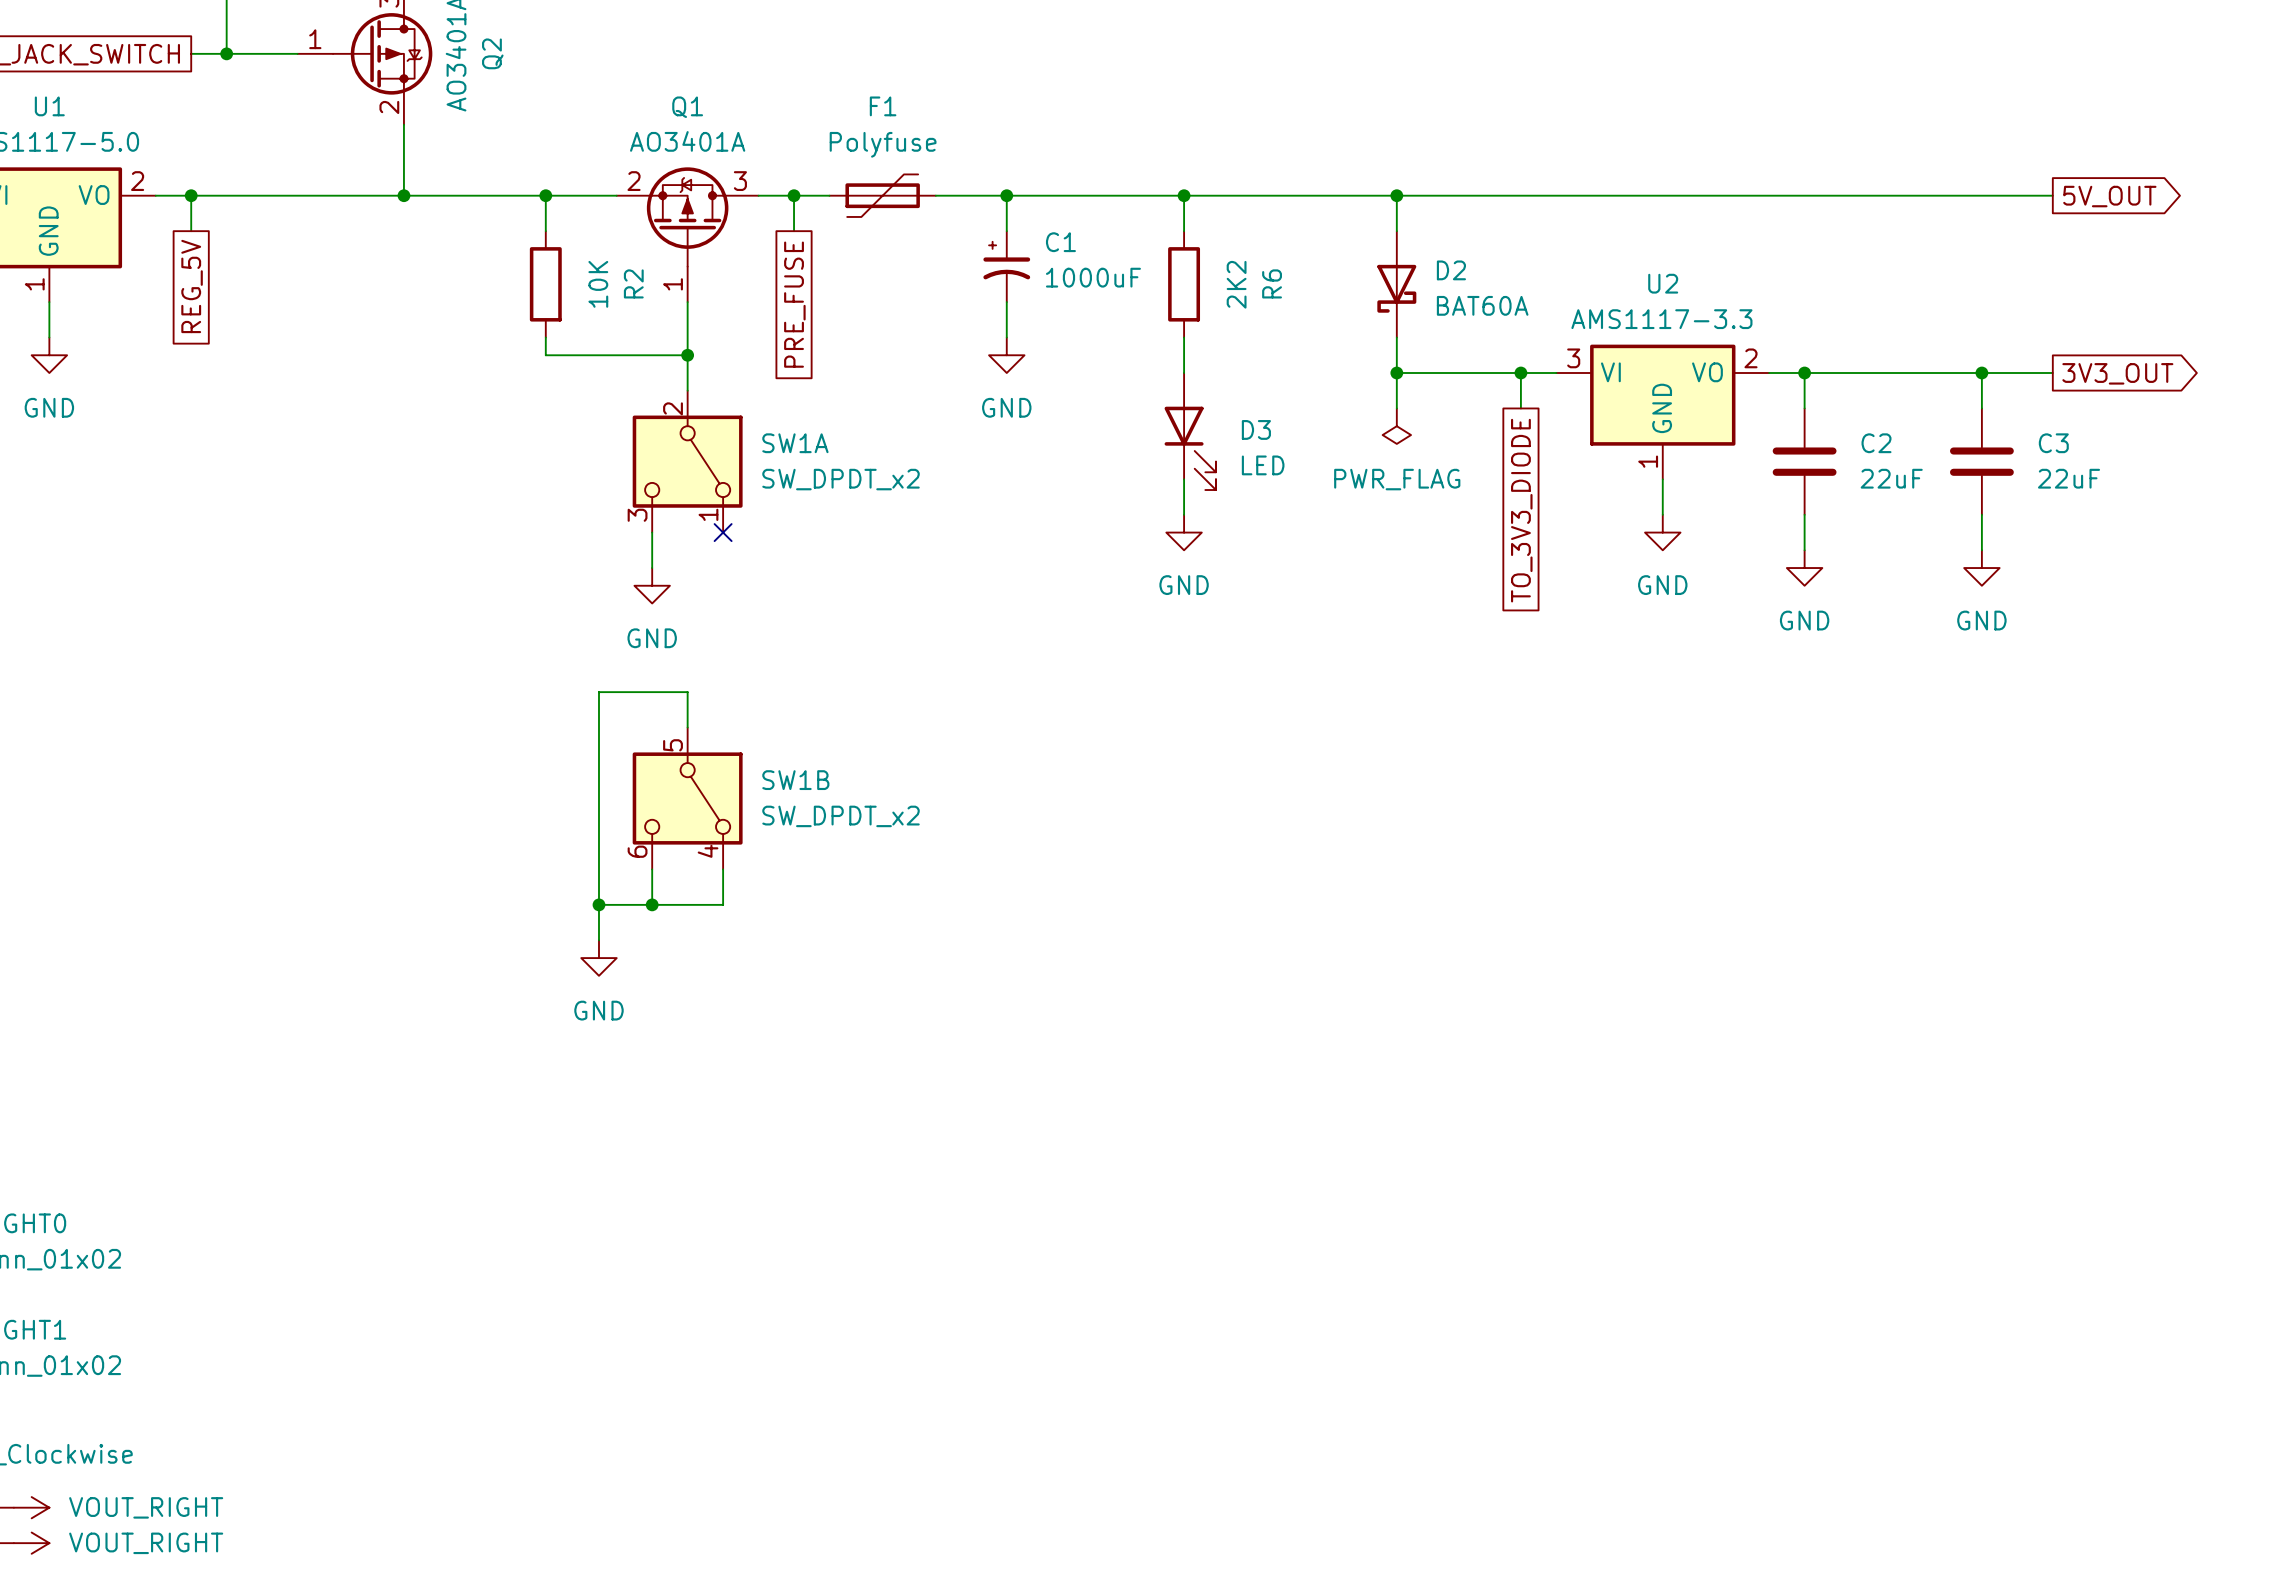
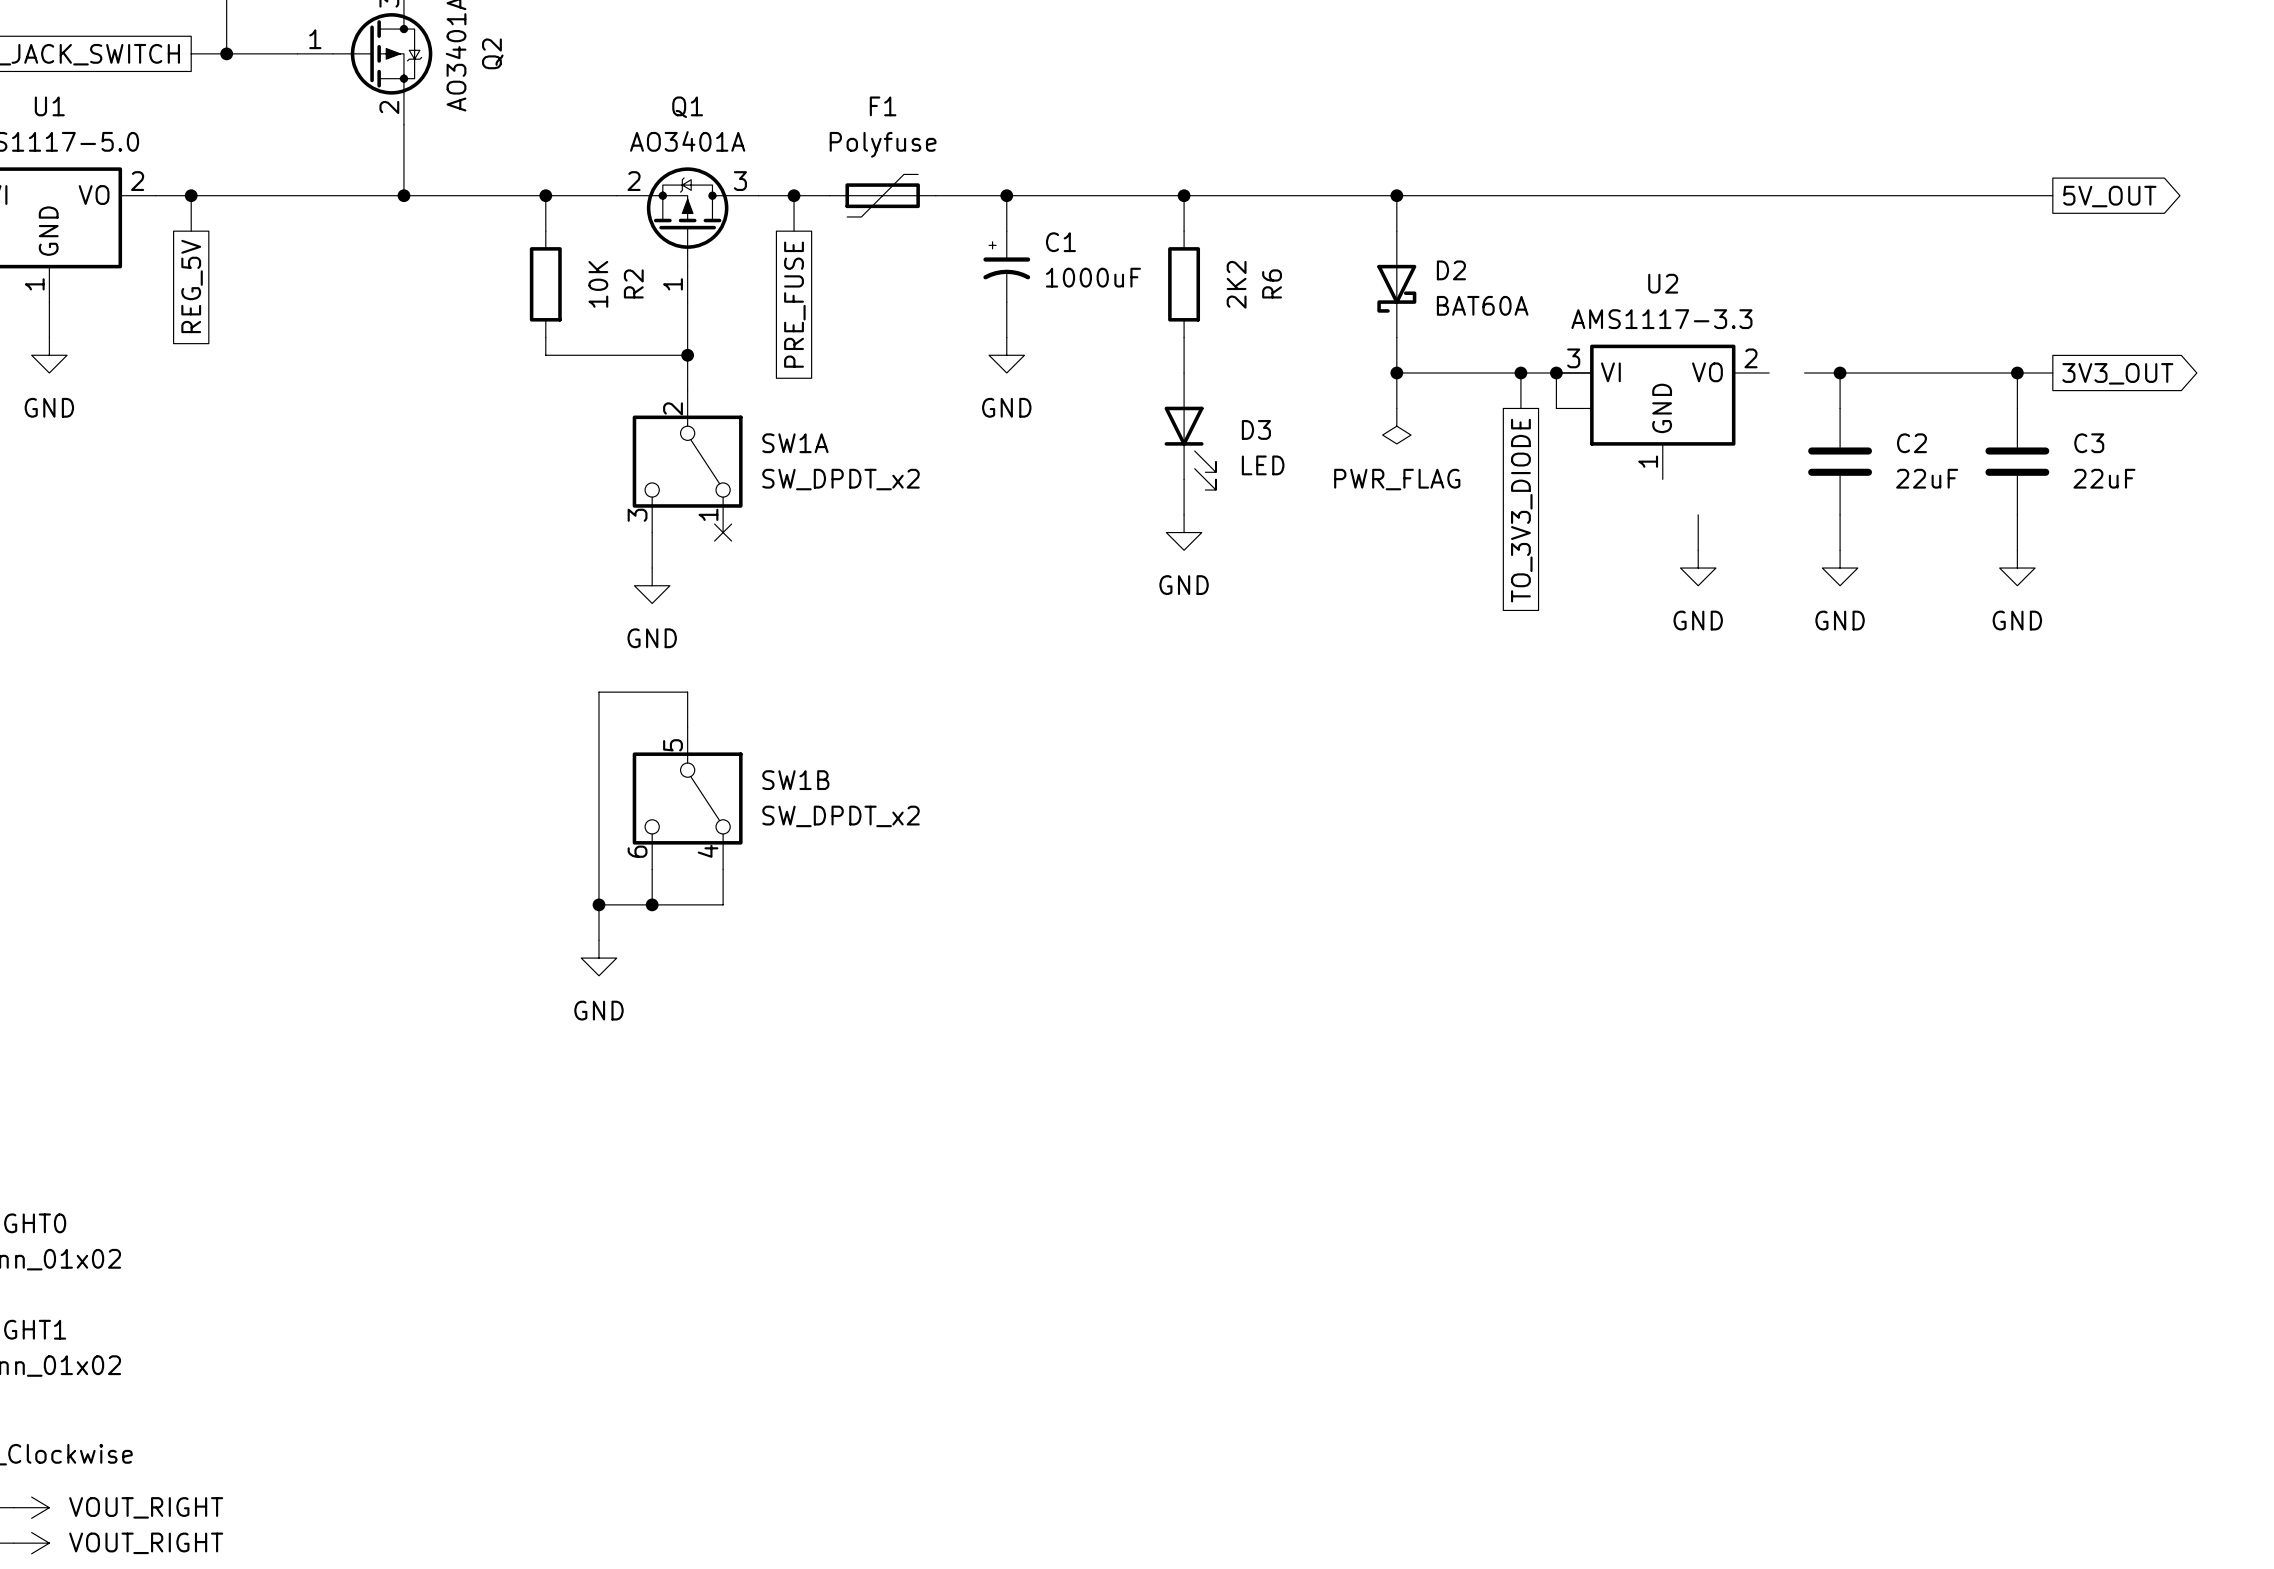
junction: none -> (1556, 372)
wire: none -> (1591, 372) (1556, 372) (1556, 408) (1591, 408)
wire: (1769, 372) (1804, 372) (1804, 408) -> none
junction position: (1804, 372) -> (1840, 372)
wire: none -> (1840, 372) (1840, 408)
wire: (1981, 372) (1981, 408) -> (2017, 372) (2017, 408)
junction position: (1981, 372) -> (2017, 372)
C2 position: (1804, 461) -> (1840, 461)
C3 position: (1981, 461) -> (2017, 461)
wire: (1662, 479) (1662, 514) -> (1698, 514) (1698, 550)
wire: (1804, 514) (1804, 550) -> (1840, 514) (1840, 550)
wire: (1981, 514) (1981, 550) -> (2017, 514) (2017, 550)
power symbol position: GND (1662, 532) -> GND (1698, 568)
power symbol position: GND (1804, 568) -> GND (1840, 568)
power symbol position: GND (1981, 568) -> GND (2017, 568)

